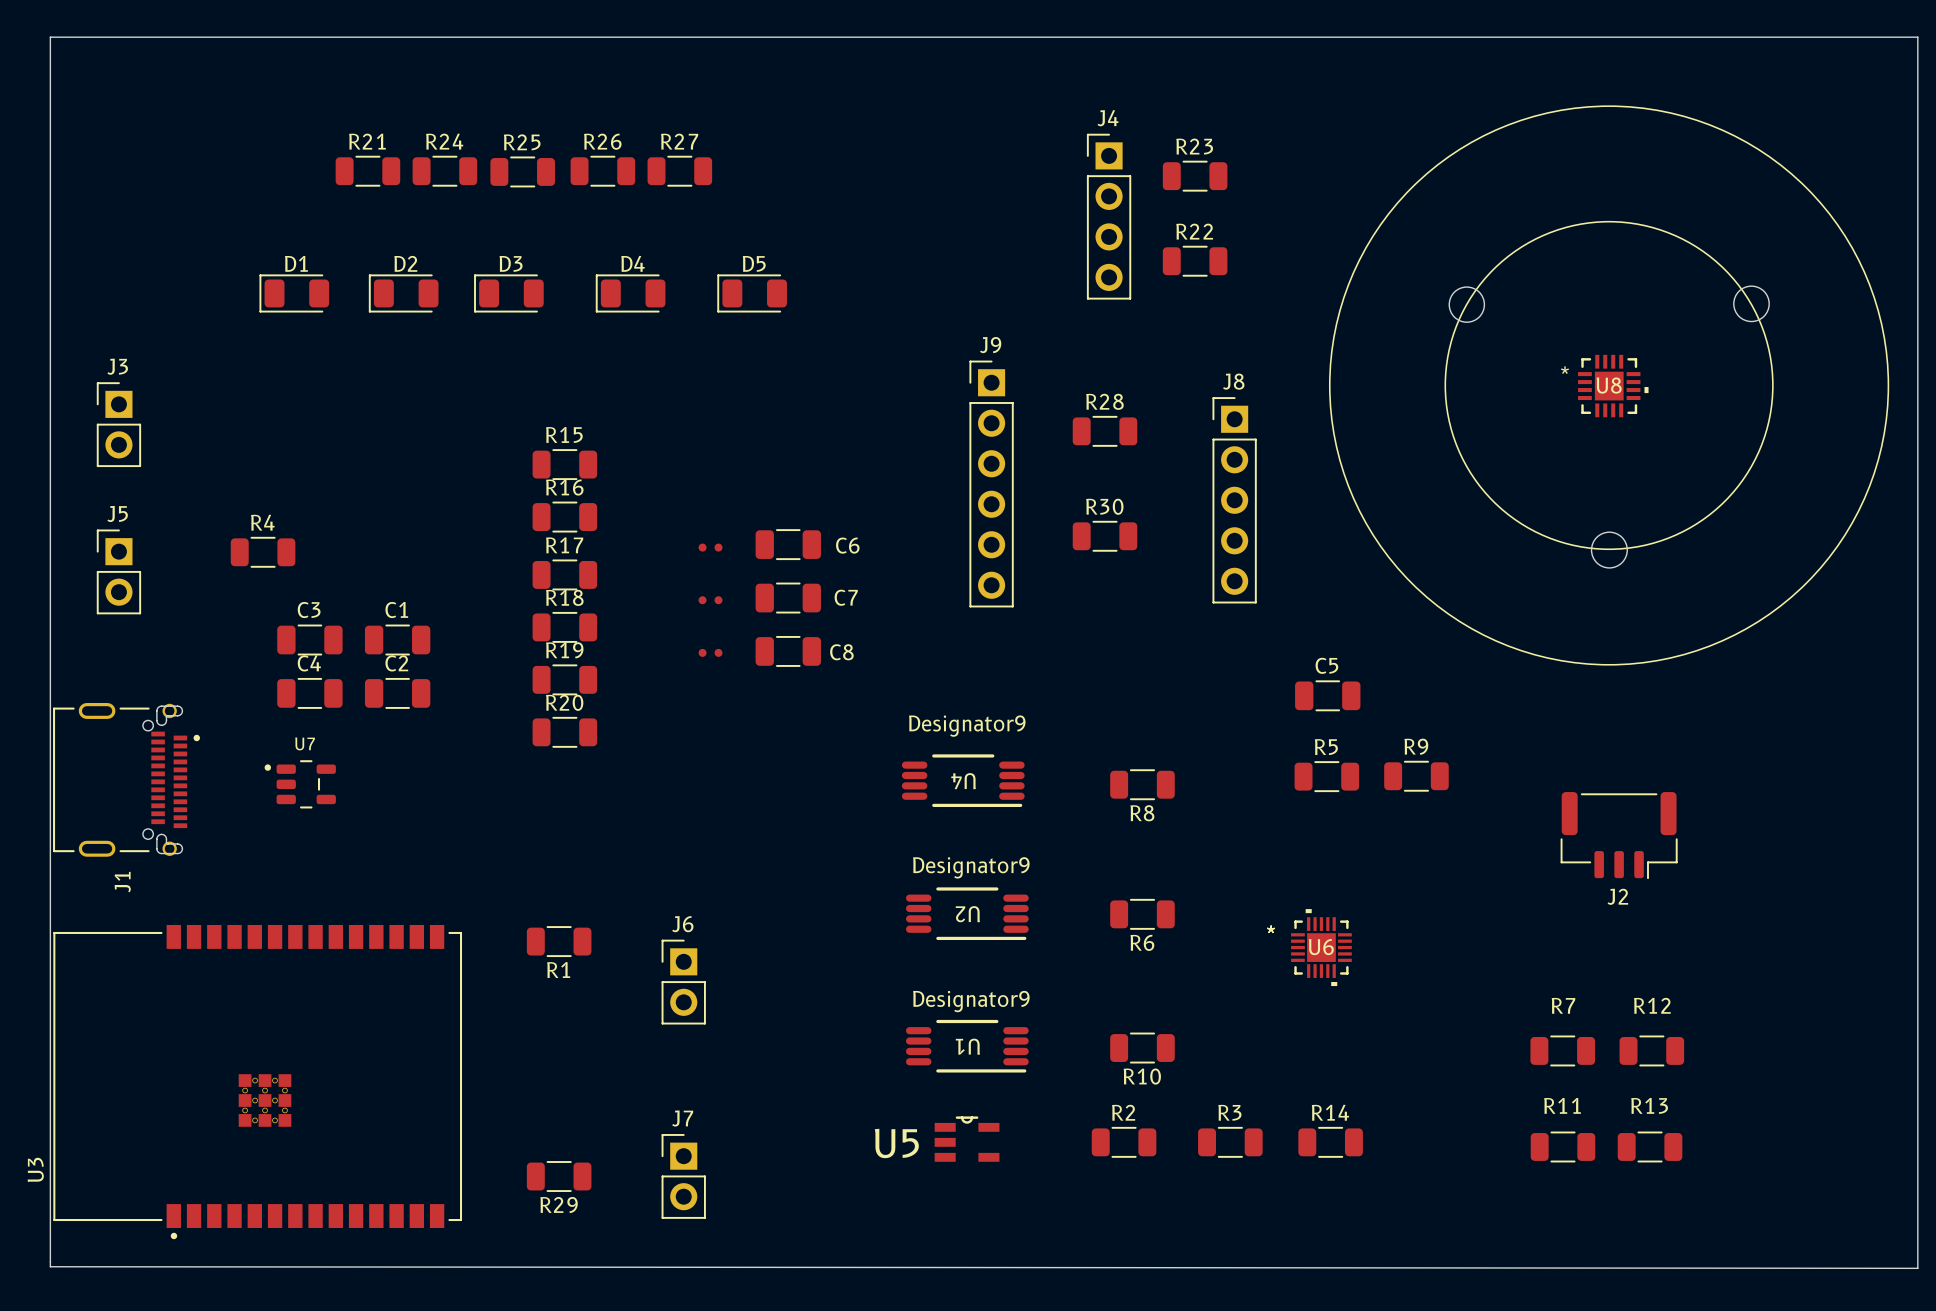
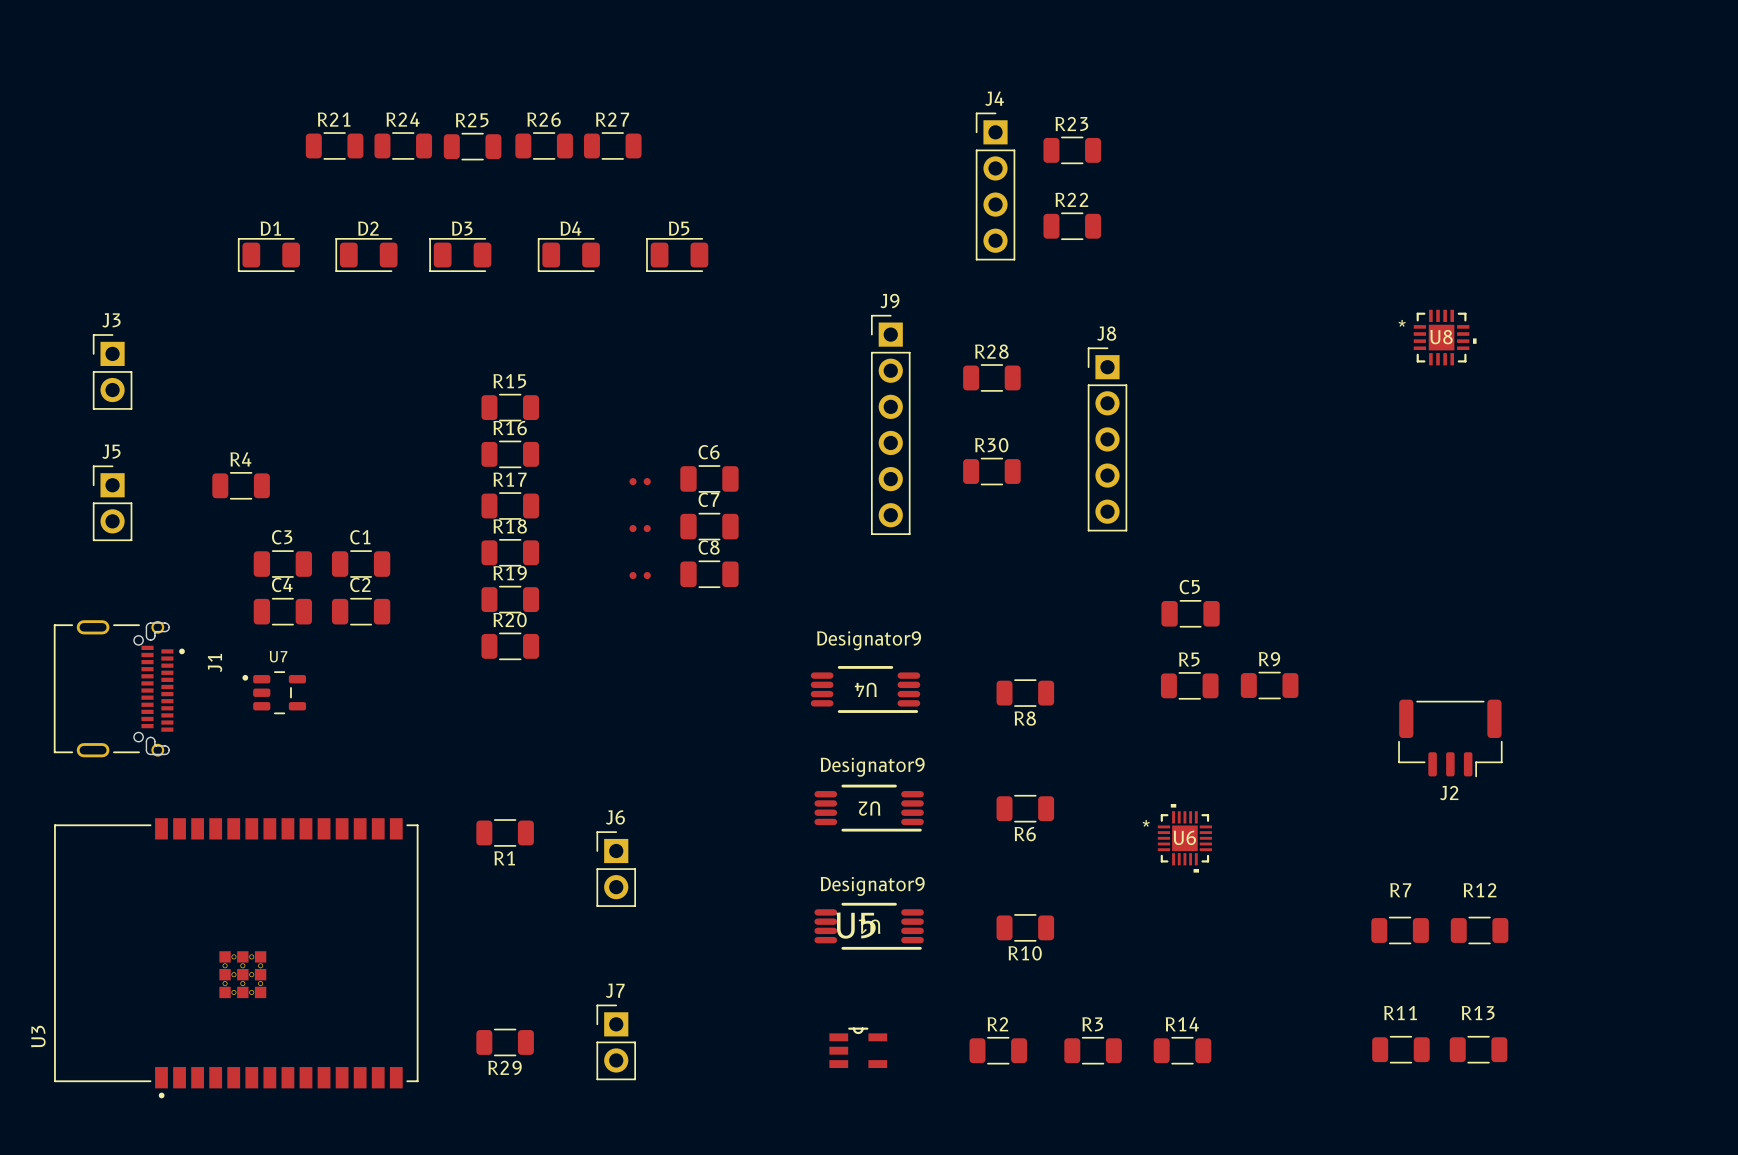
board edge: (50, 37) (50, 1266) (1917, 1268) (1917, 37) (50, 37) -> none
drawing: [1328, 105, 1890, 666] -> none
round board edge: [1733, 285, 1770, 322] -> none
round board edge: [1448, 286, 1485, 323] -> none
round board edge: [1591, 531, 1628, 569] -> none
C6 name position: C6 (847, 545) -> C6 (709, 452)
C7 name position: C7 (846, 597) -> C7 (708, 499)
C8 name position: C8 (841, 652) -> C8 (709, 547)
J1 name position: J1 (122, 882) -> J1 (215, 662)
U6 footprint: [1291, 909, 1352, 987] -> [1157, 803, 1213, 873]
U5 position: (967, 1139) -> (858, 1047)
R2 position: (1124, 1142) -> (998, 1050)
R3 position: (1230, 1142) -> (1093, 1050)
R14 position: (1330, 1142) -> (1182, 1050)
U5 name position: U5 (896, 1143) -> U5 (856, 925)
R11 position: (1563, 1146) -> (1400, 1049)
R13 position: (1650, 1146) -> (1478, 1049)

